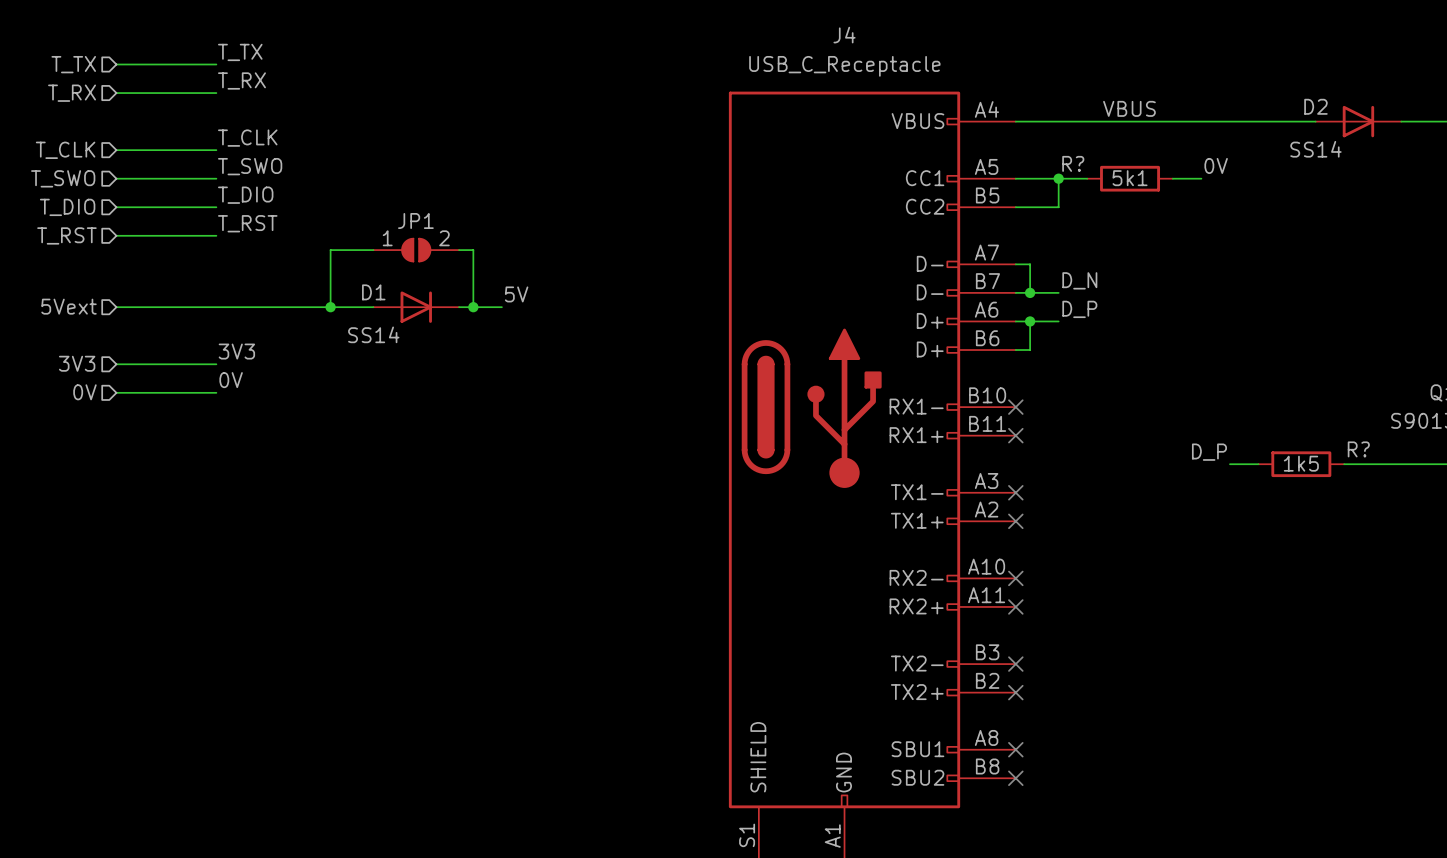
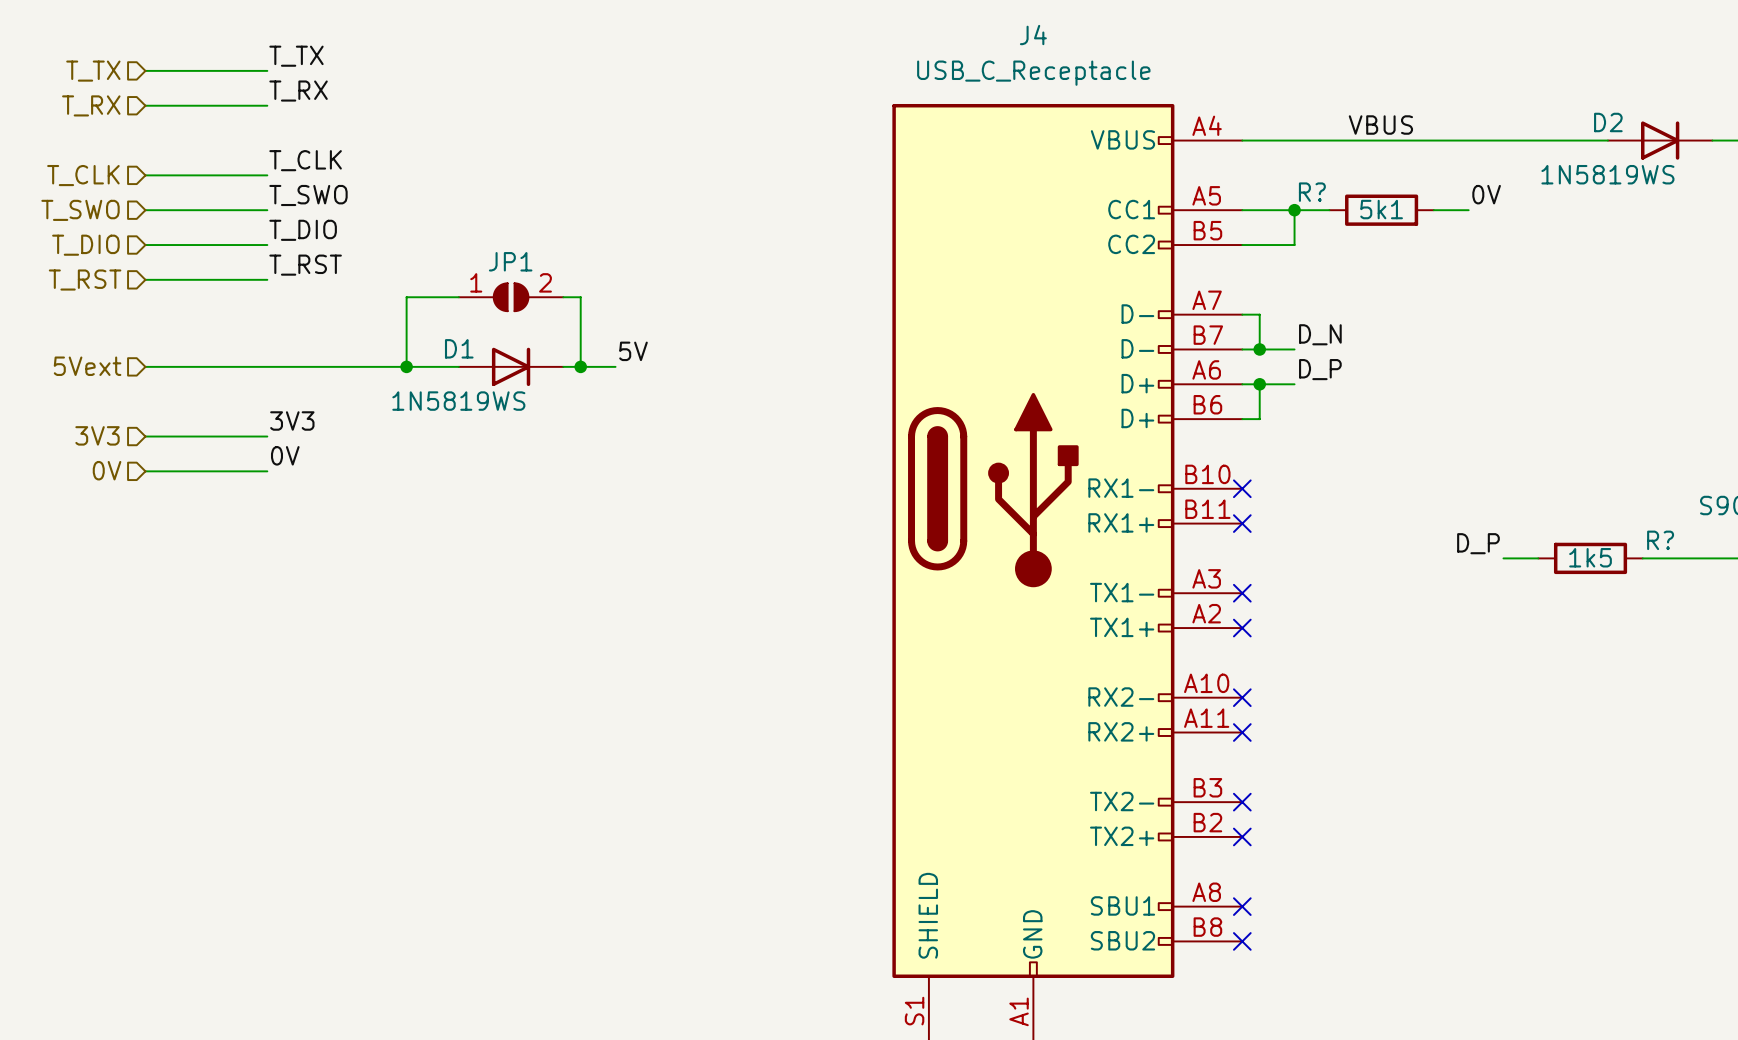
D2 value: SS14 (1315, 149) -> 1N5819WS (1607, 174)
D1 value: SS14 (373, 334) -> 1N5819WS (458, 401)

